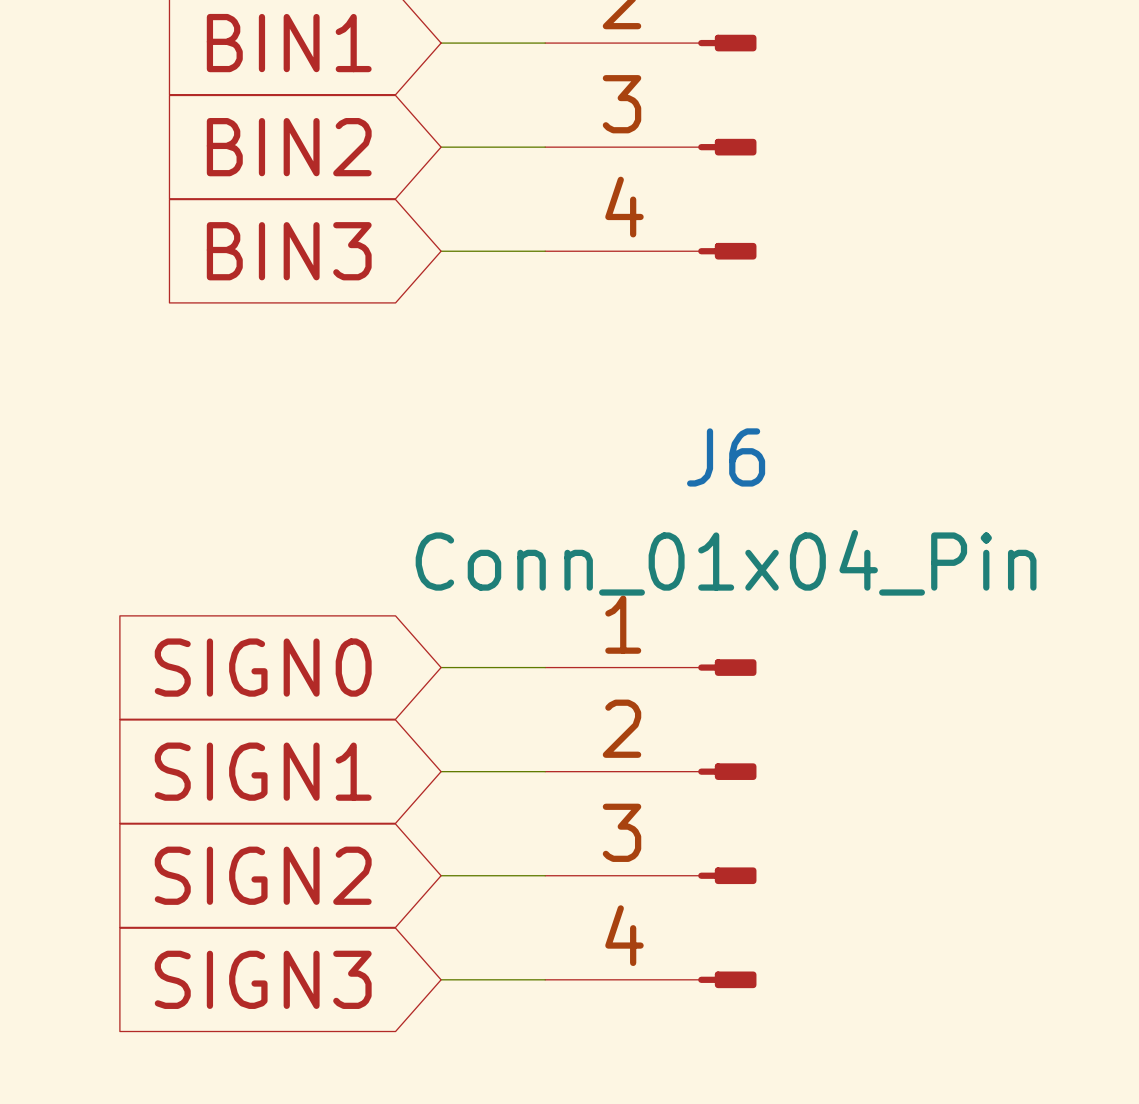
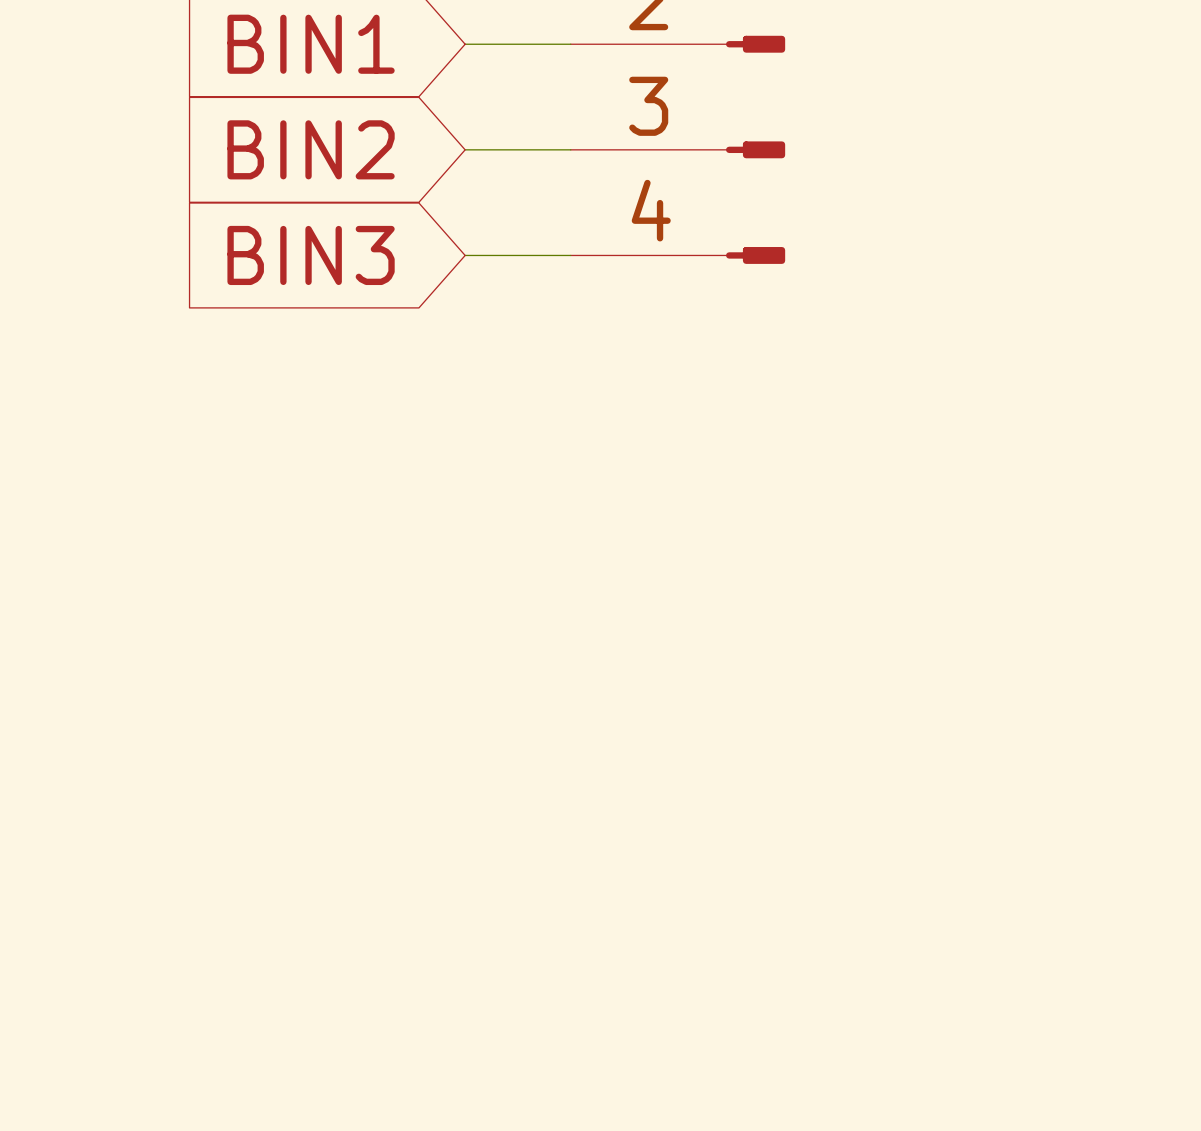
global label: SIGN0 (263, 667) -> none
wire: (441, 667) (545, 667) -> none
global label: SIGN1 (263, 771) -> none
wire: (441, 771) (545, 771) -> none
J6: Conn_01x04_Pin (650, 823) -> none
global label: SIGN2 (263, 875) -> none
wire: (441, 875) (545, 875) -> none
global label: SIGN3 (263, 979) -> none
wire: (441, 979) (545, 979) -> none

